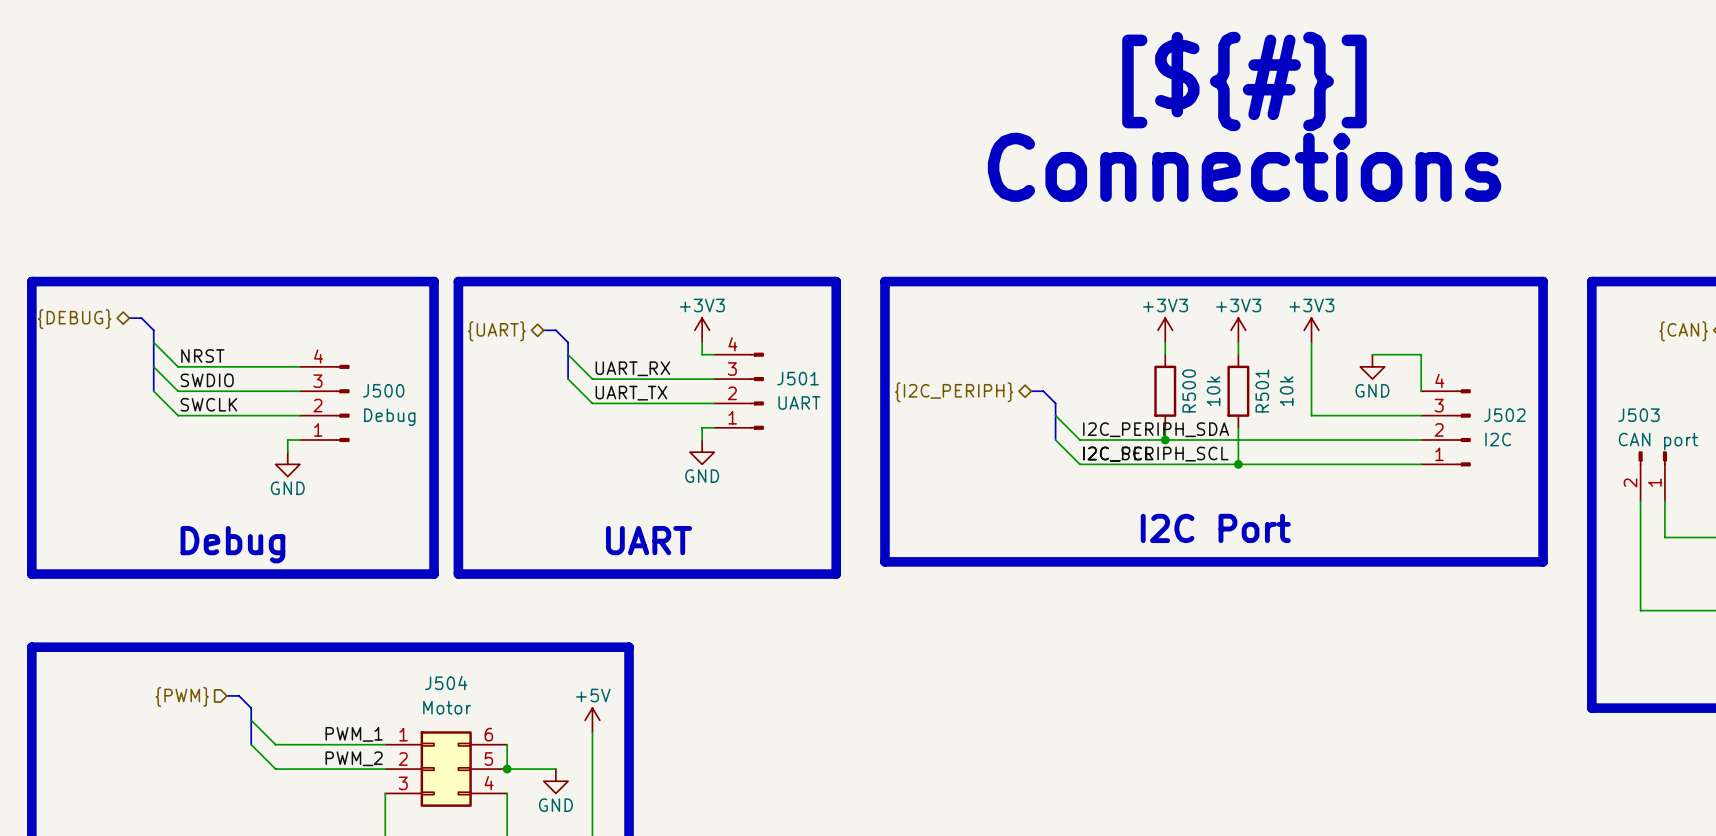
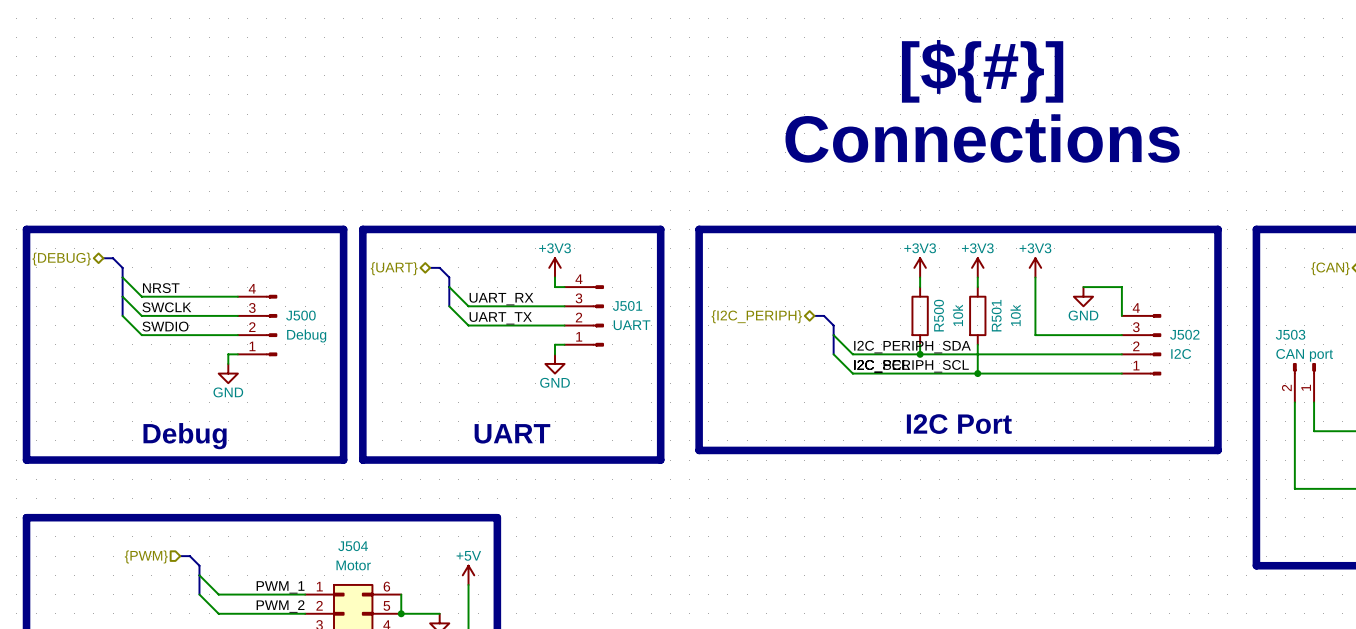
label: SWDIO (207, 380) -> SWCLK (166, 307)
label: SWCLK (208, 404) -> SWDIO (165, 326)

